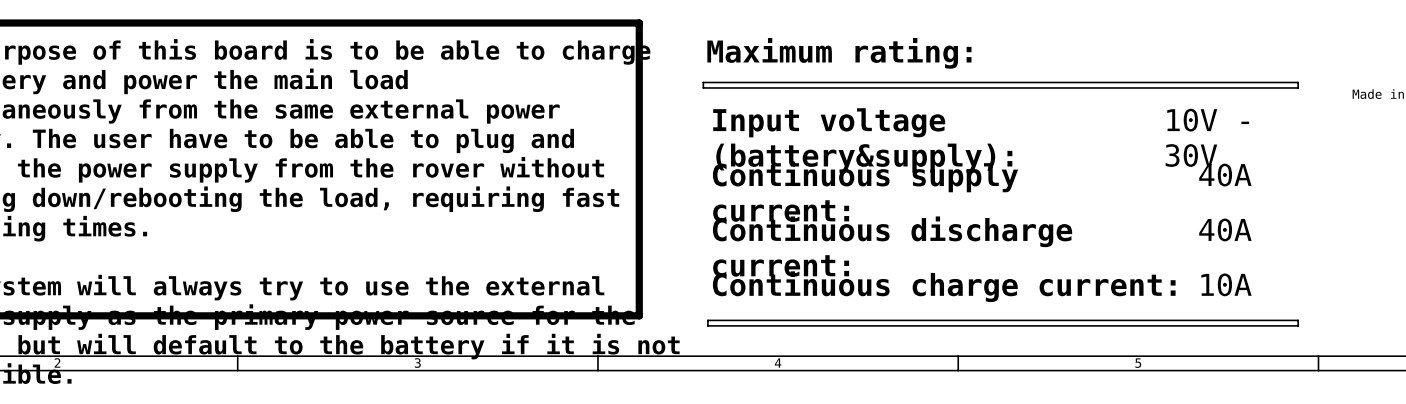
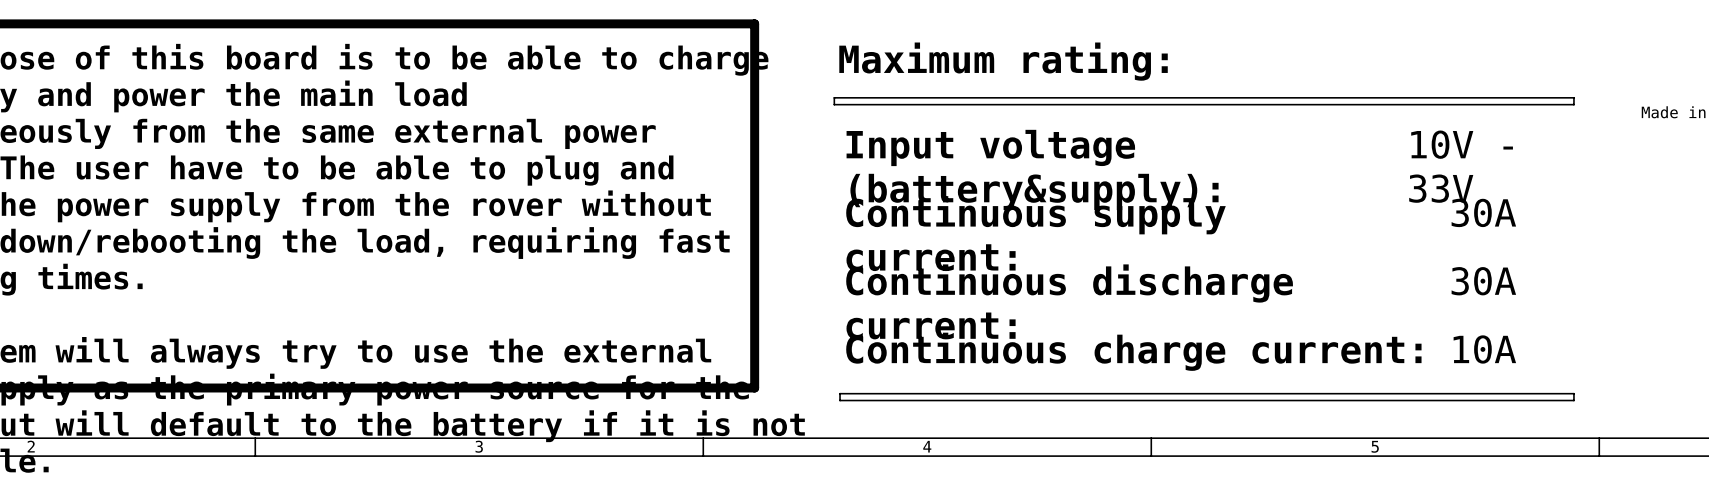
text: 30V (1191, 155) -> 33V (1441, 188)
text: 40A (1225, 175) -> 30A (1483, 212)
text: 40A (1225, 229) -> 30A (1483, 281)

